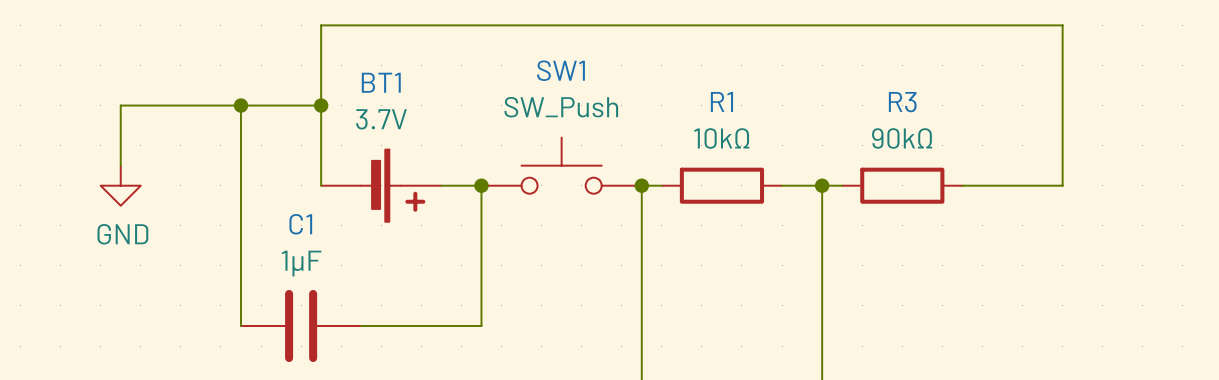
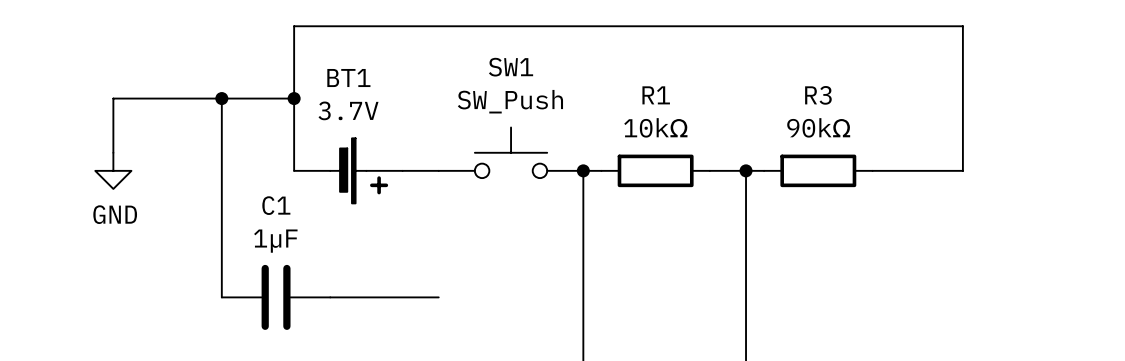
wire: (481, 185) (481, 325) -> none
junction: (481, 185) -> none

